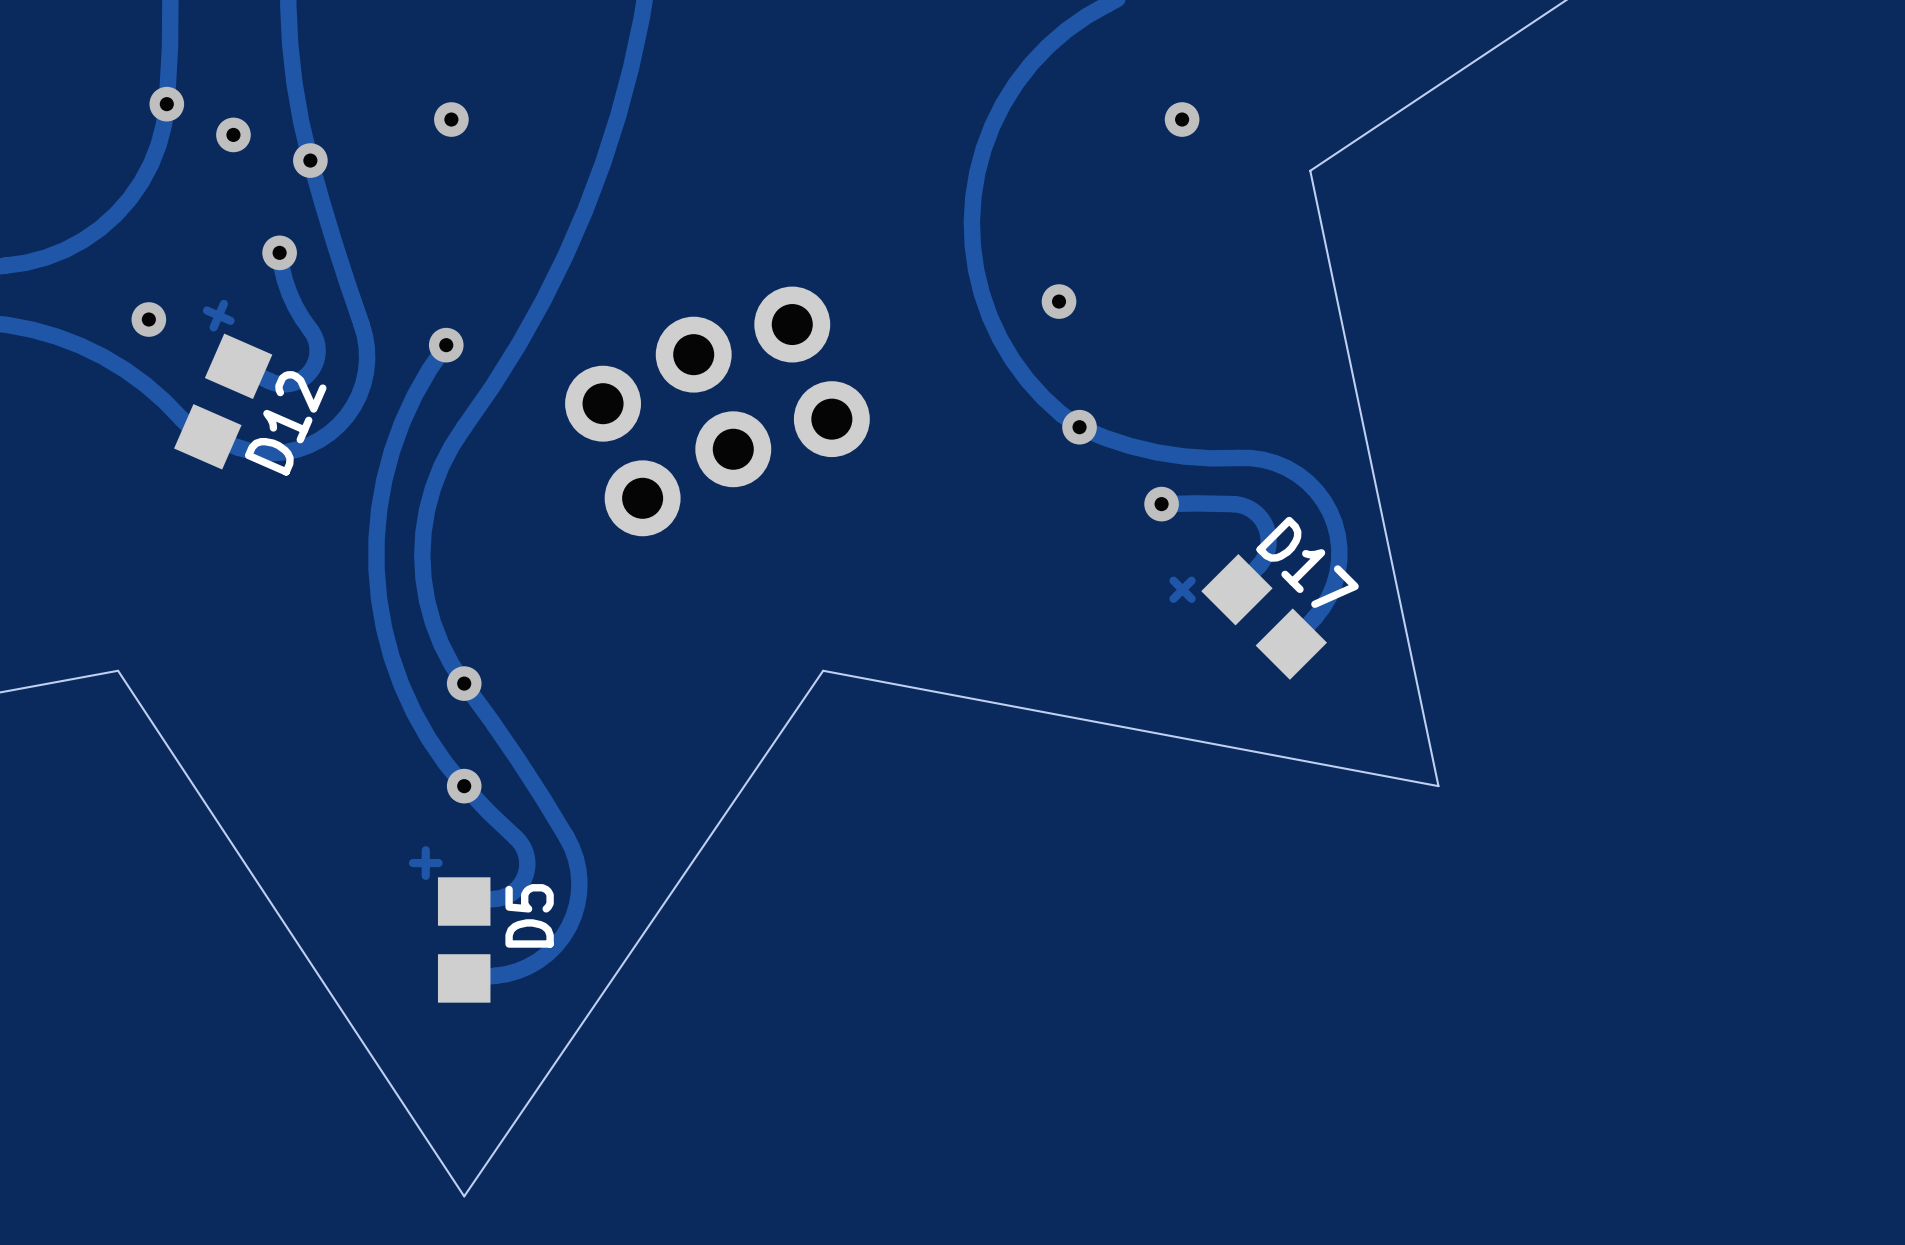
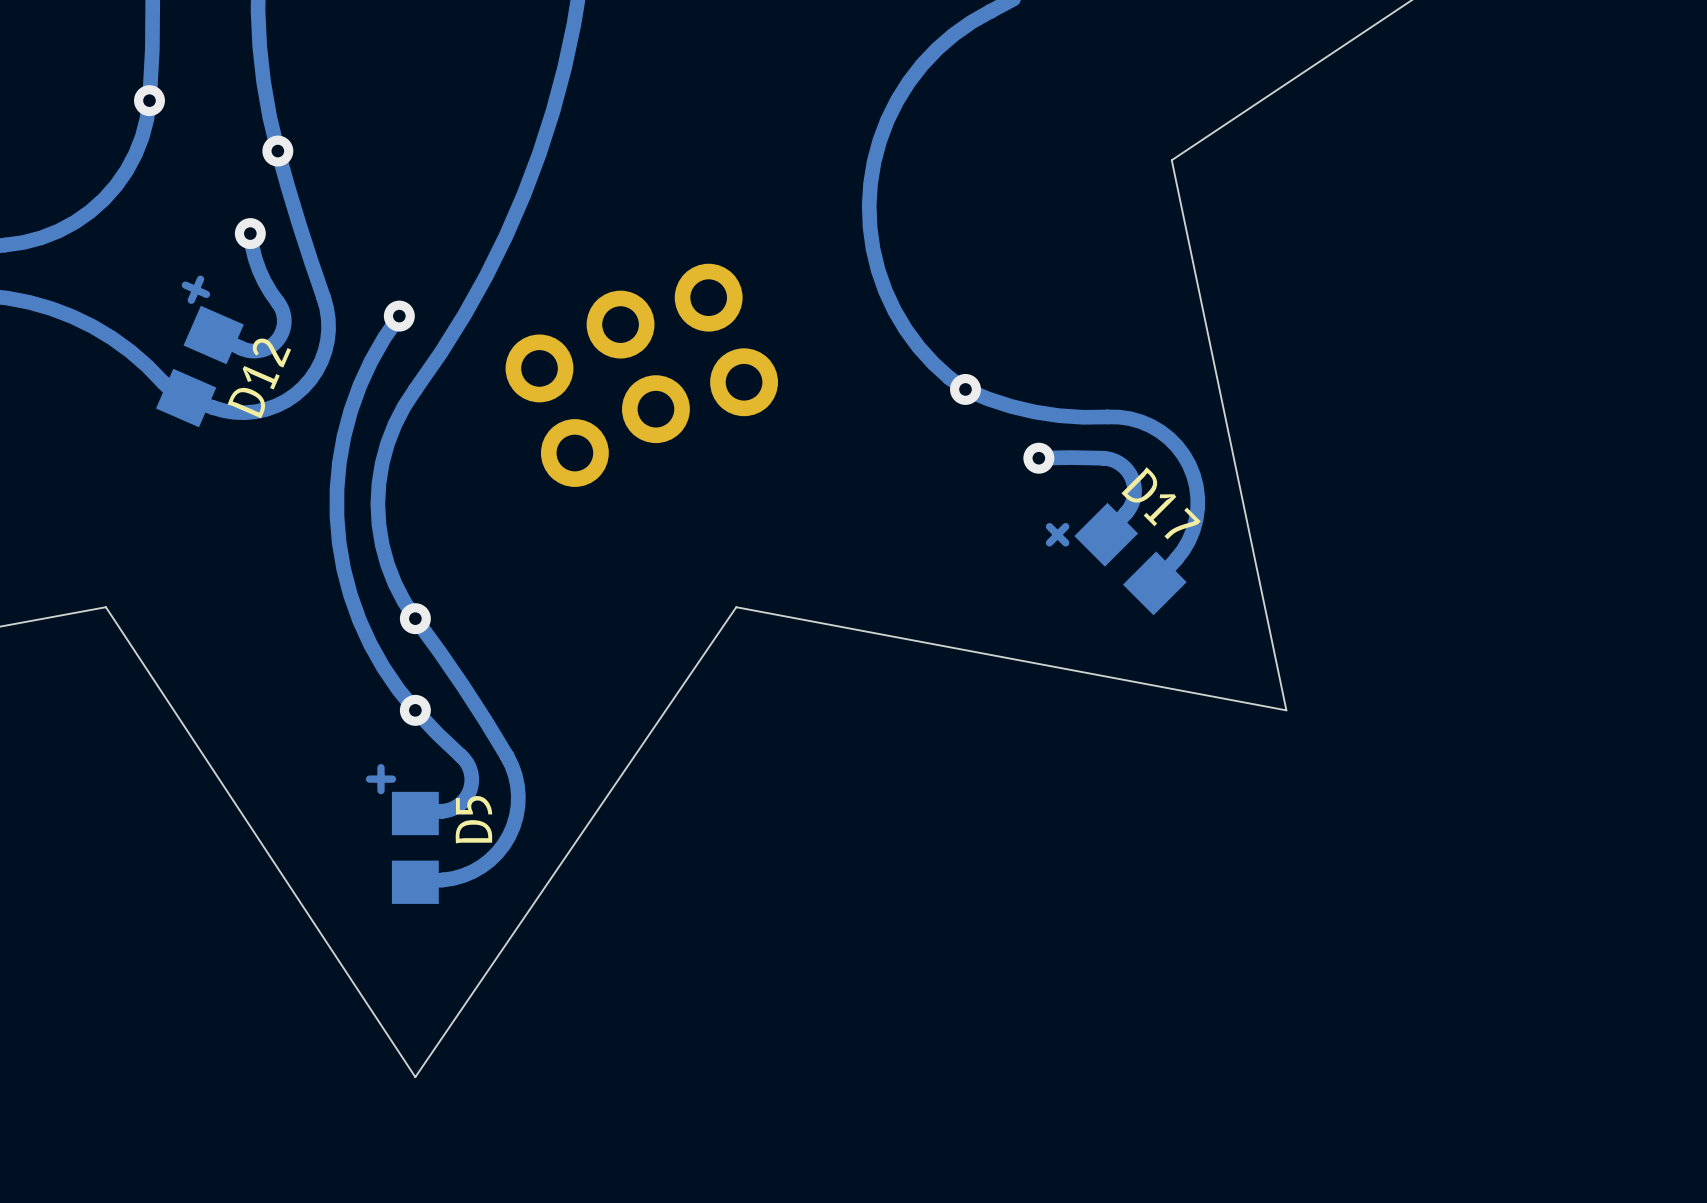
via: (451, 119) -> none
via: (1182, 119) -> none
via: (233, 134) -> none
via: (1059, 301) -> none
via: (148, 319) -> none

